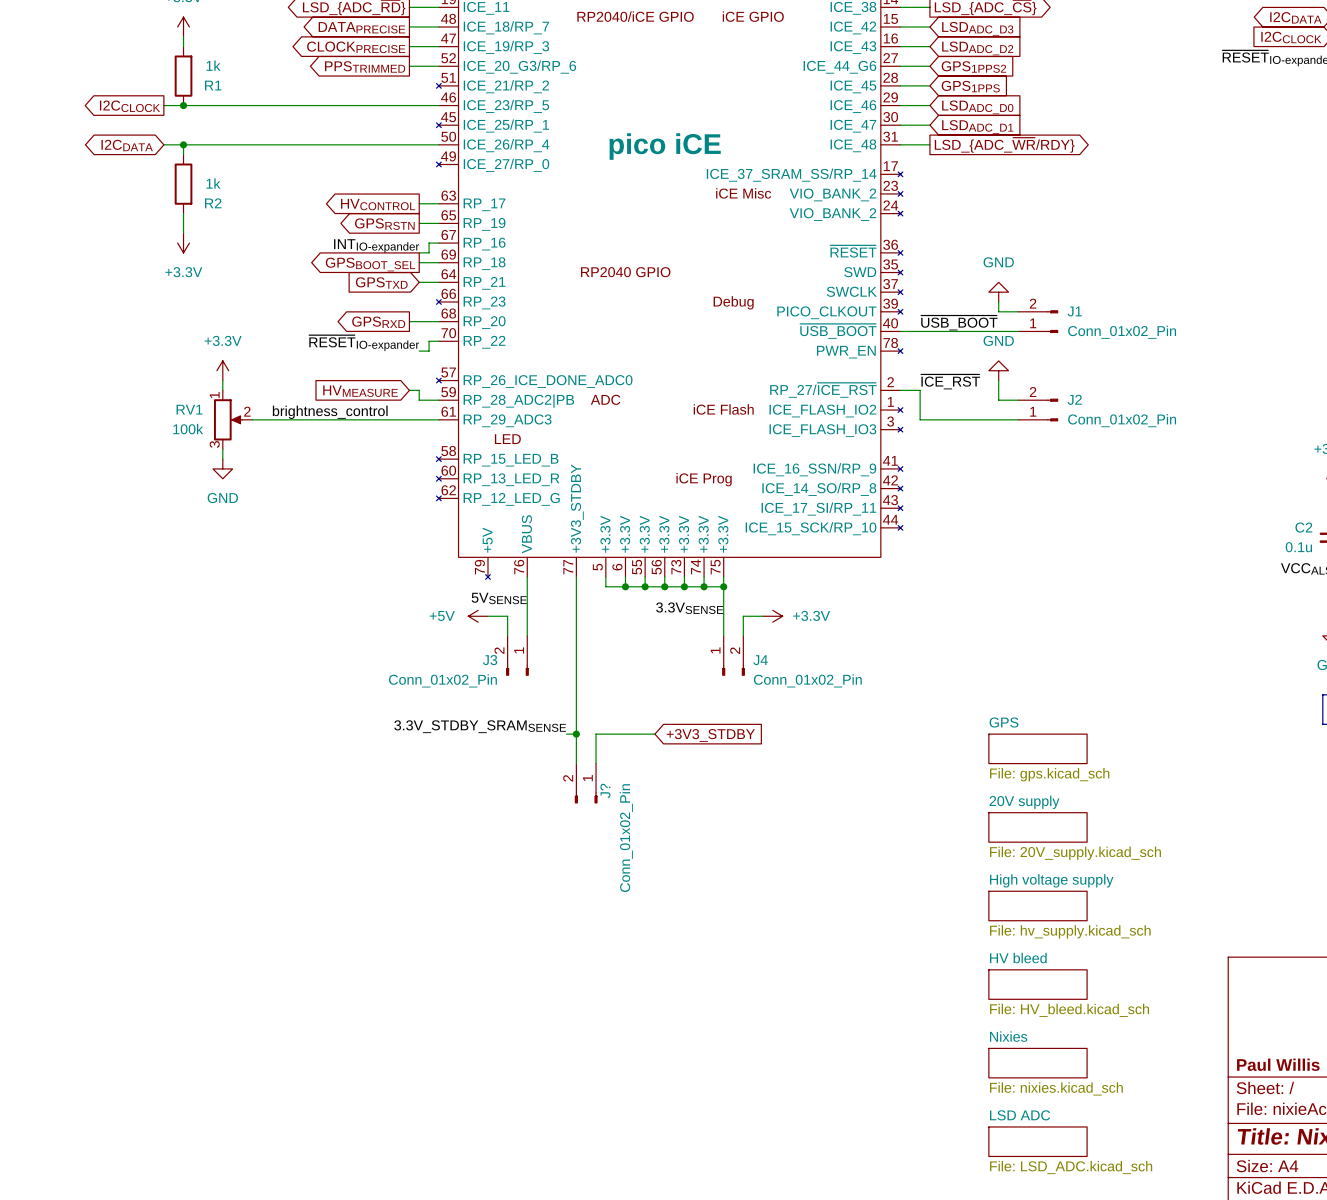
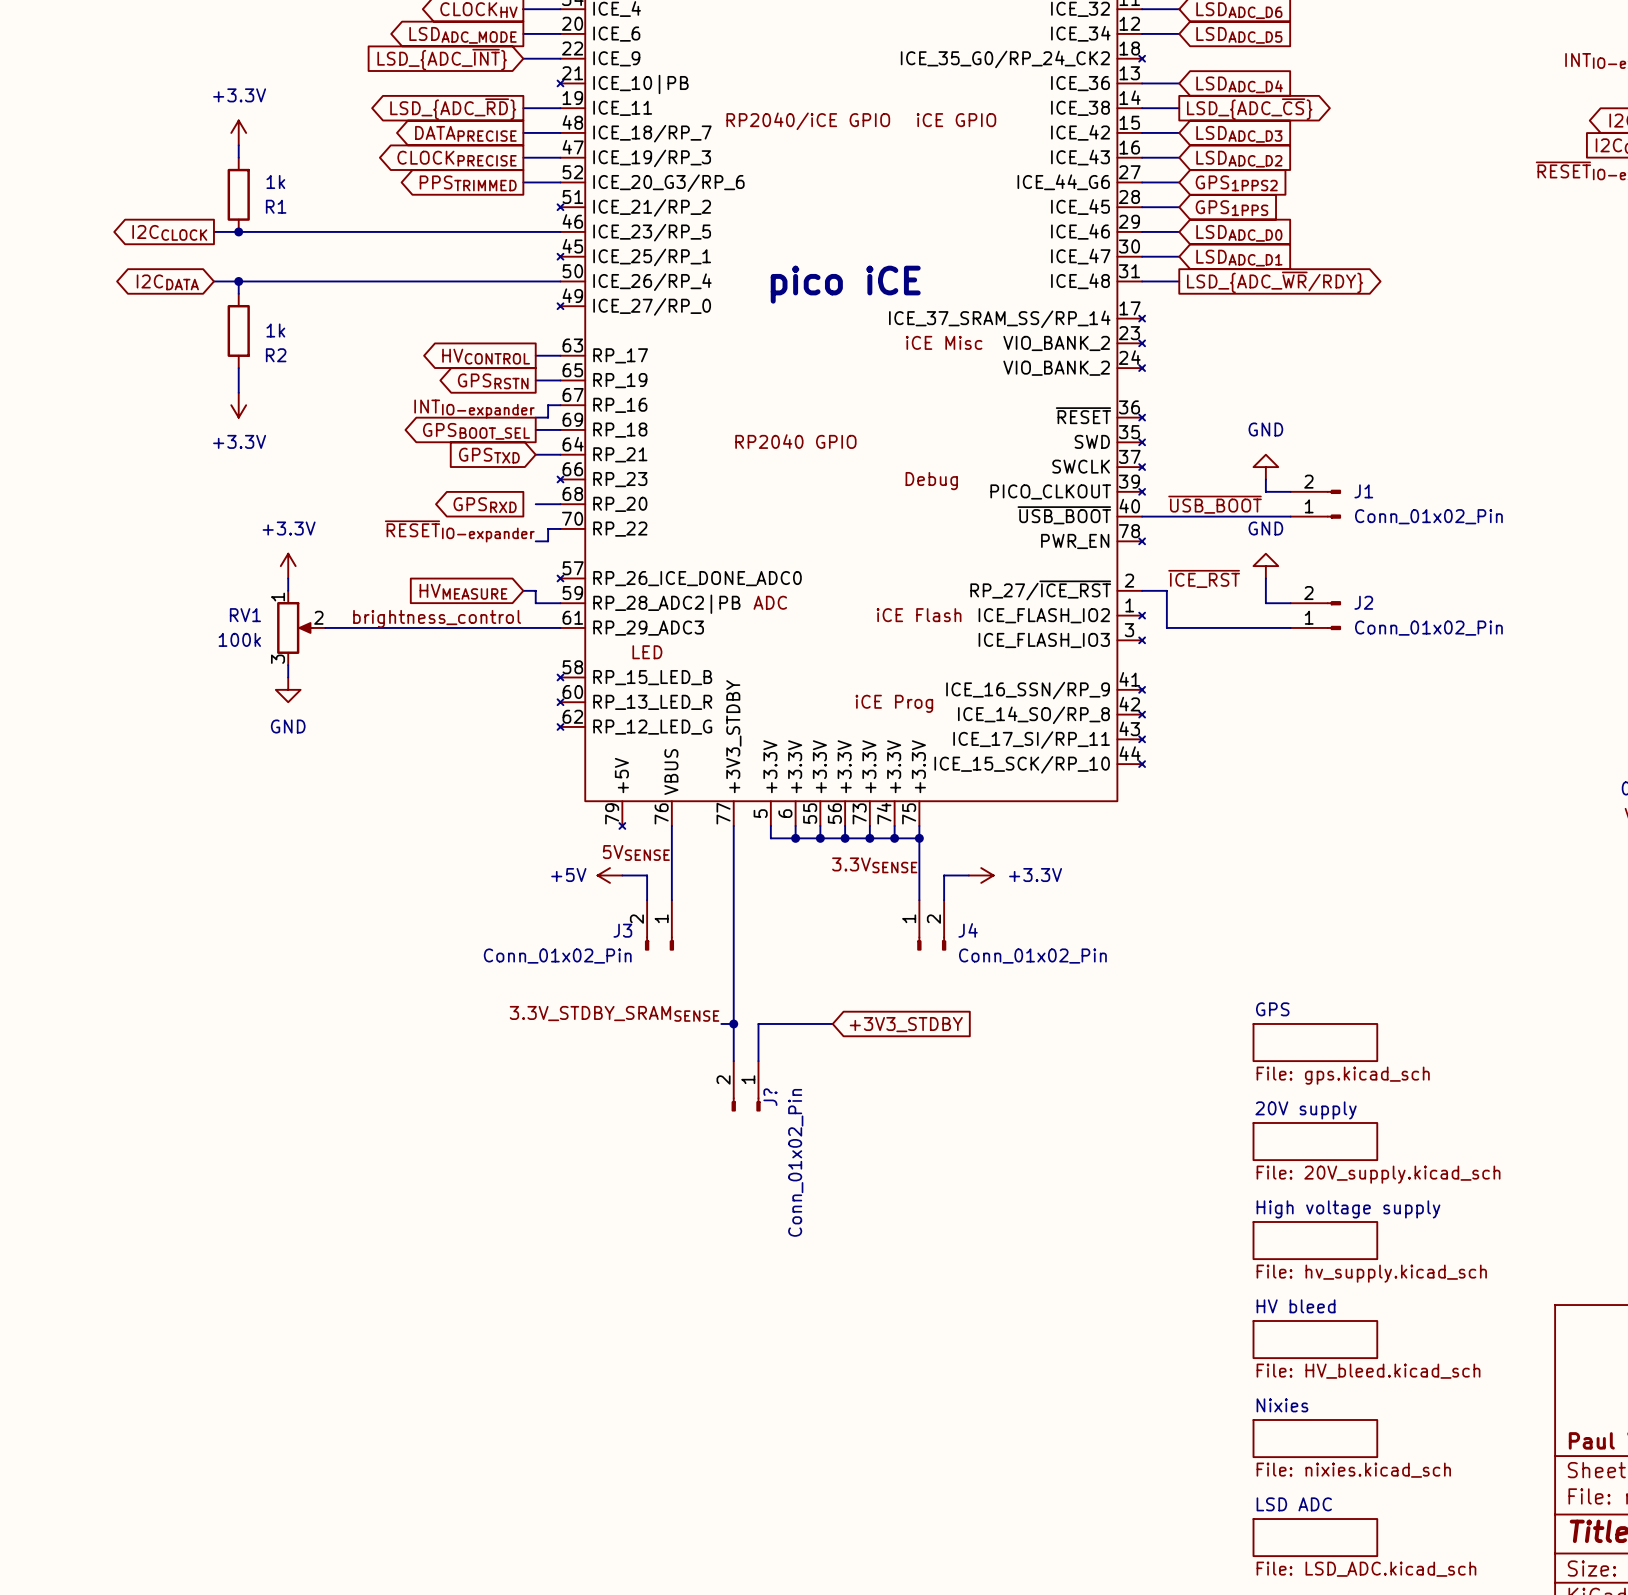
wire: (409, 321) (419, 321) -> none

